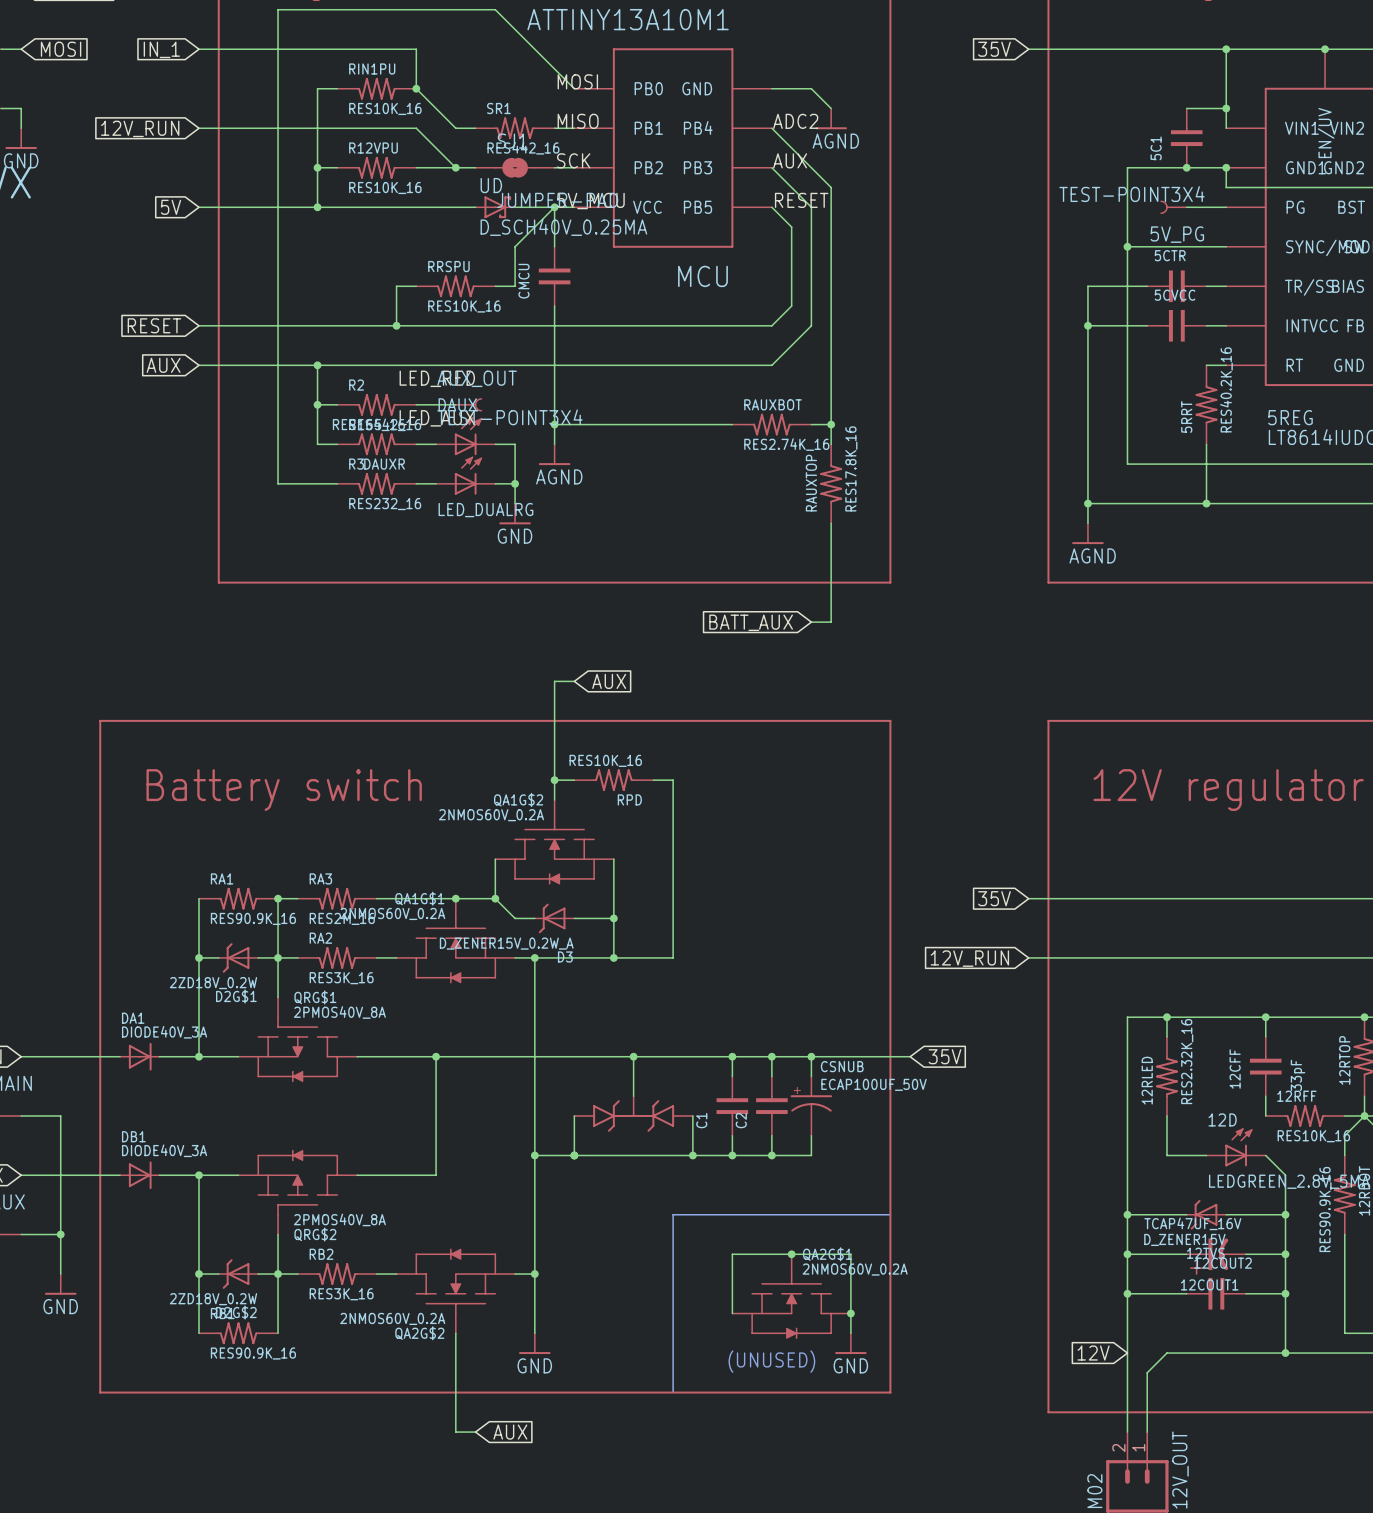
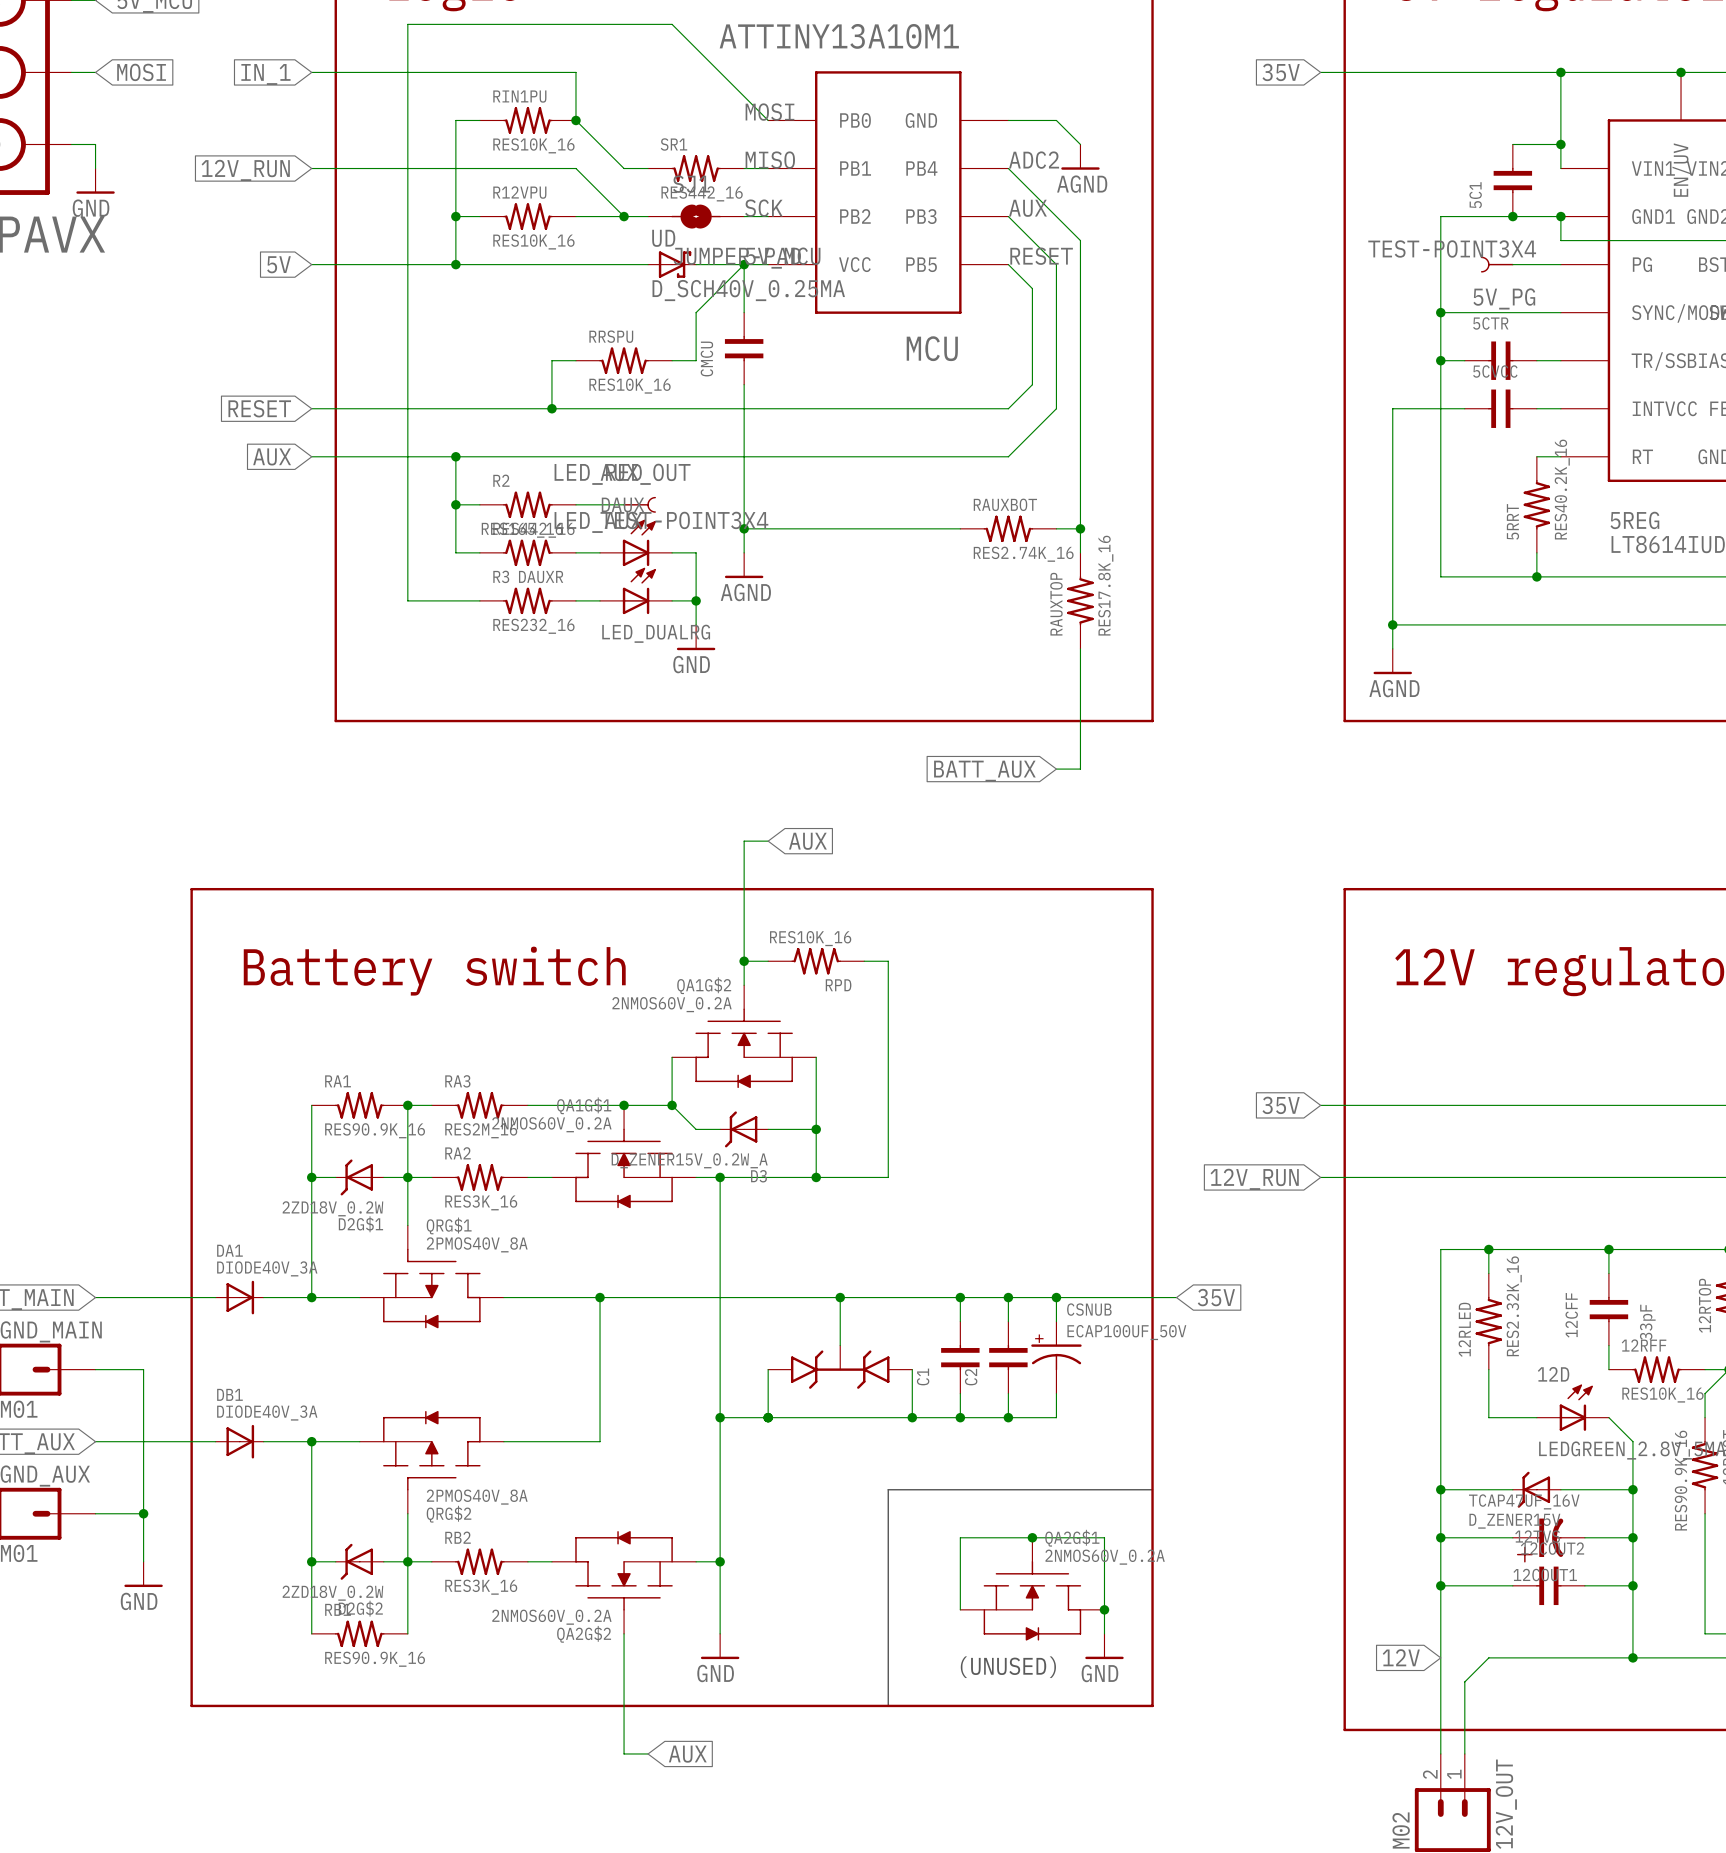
wire: (1127, 286) (1087, 286) (1087, 325) -> none
junction: none -> (1440, 360)
junction: (1087, 325) -> none
wire: (1206, 464) (1206, 503) -> none
junction position: (1206, 503) -> (1536, 576)

